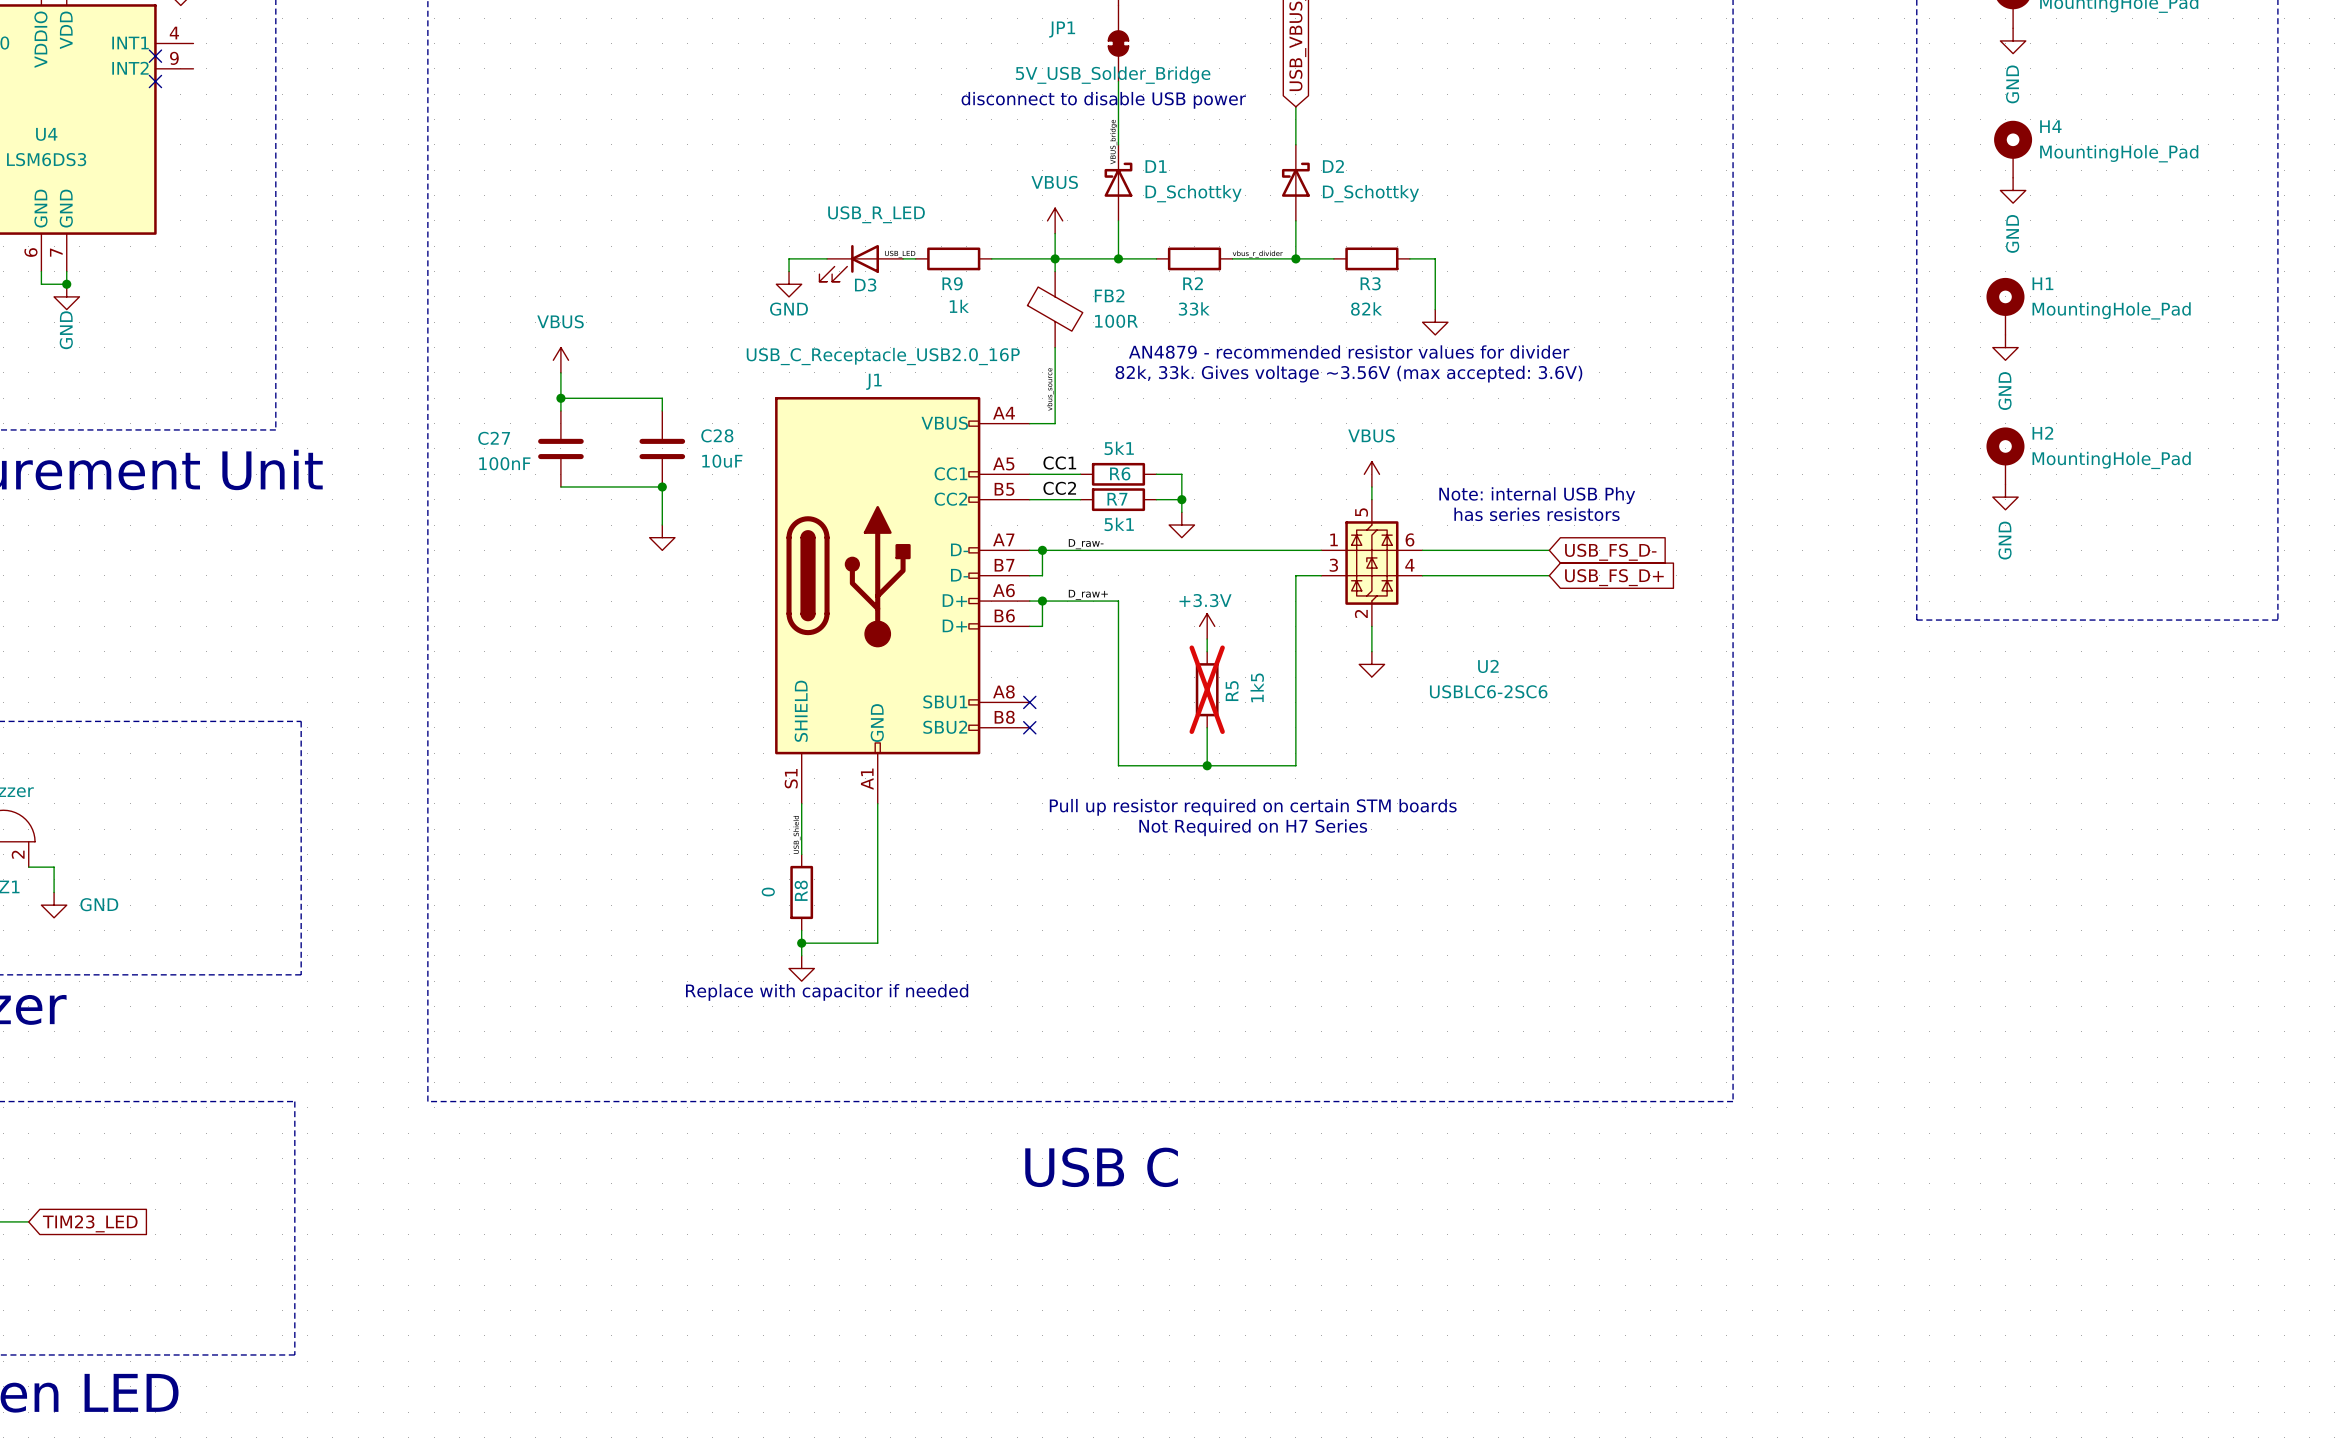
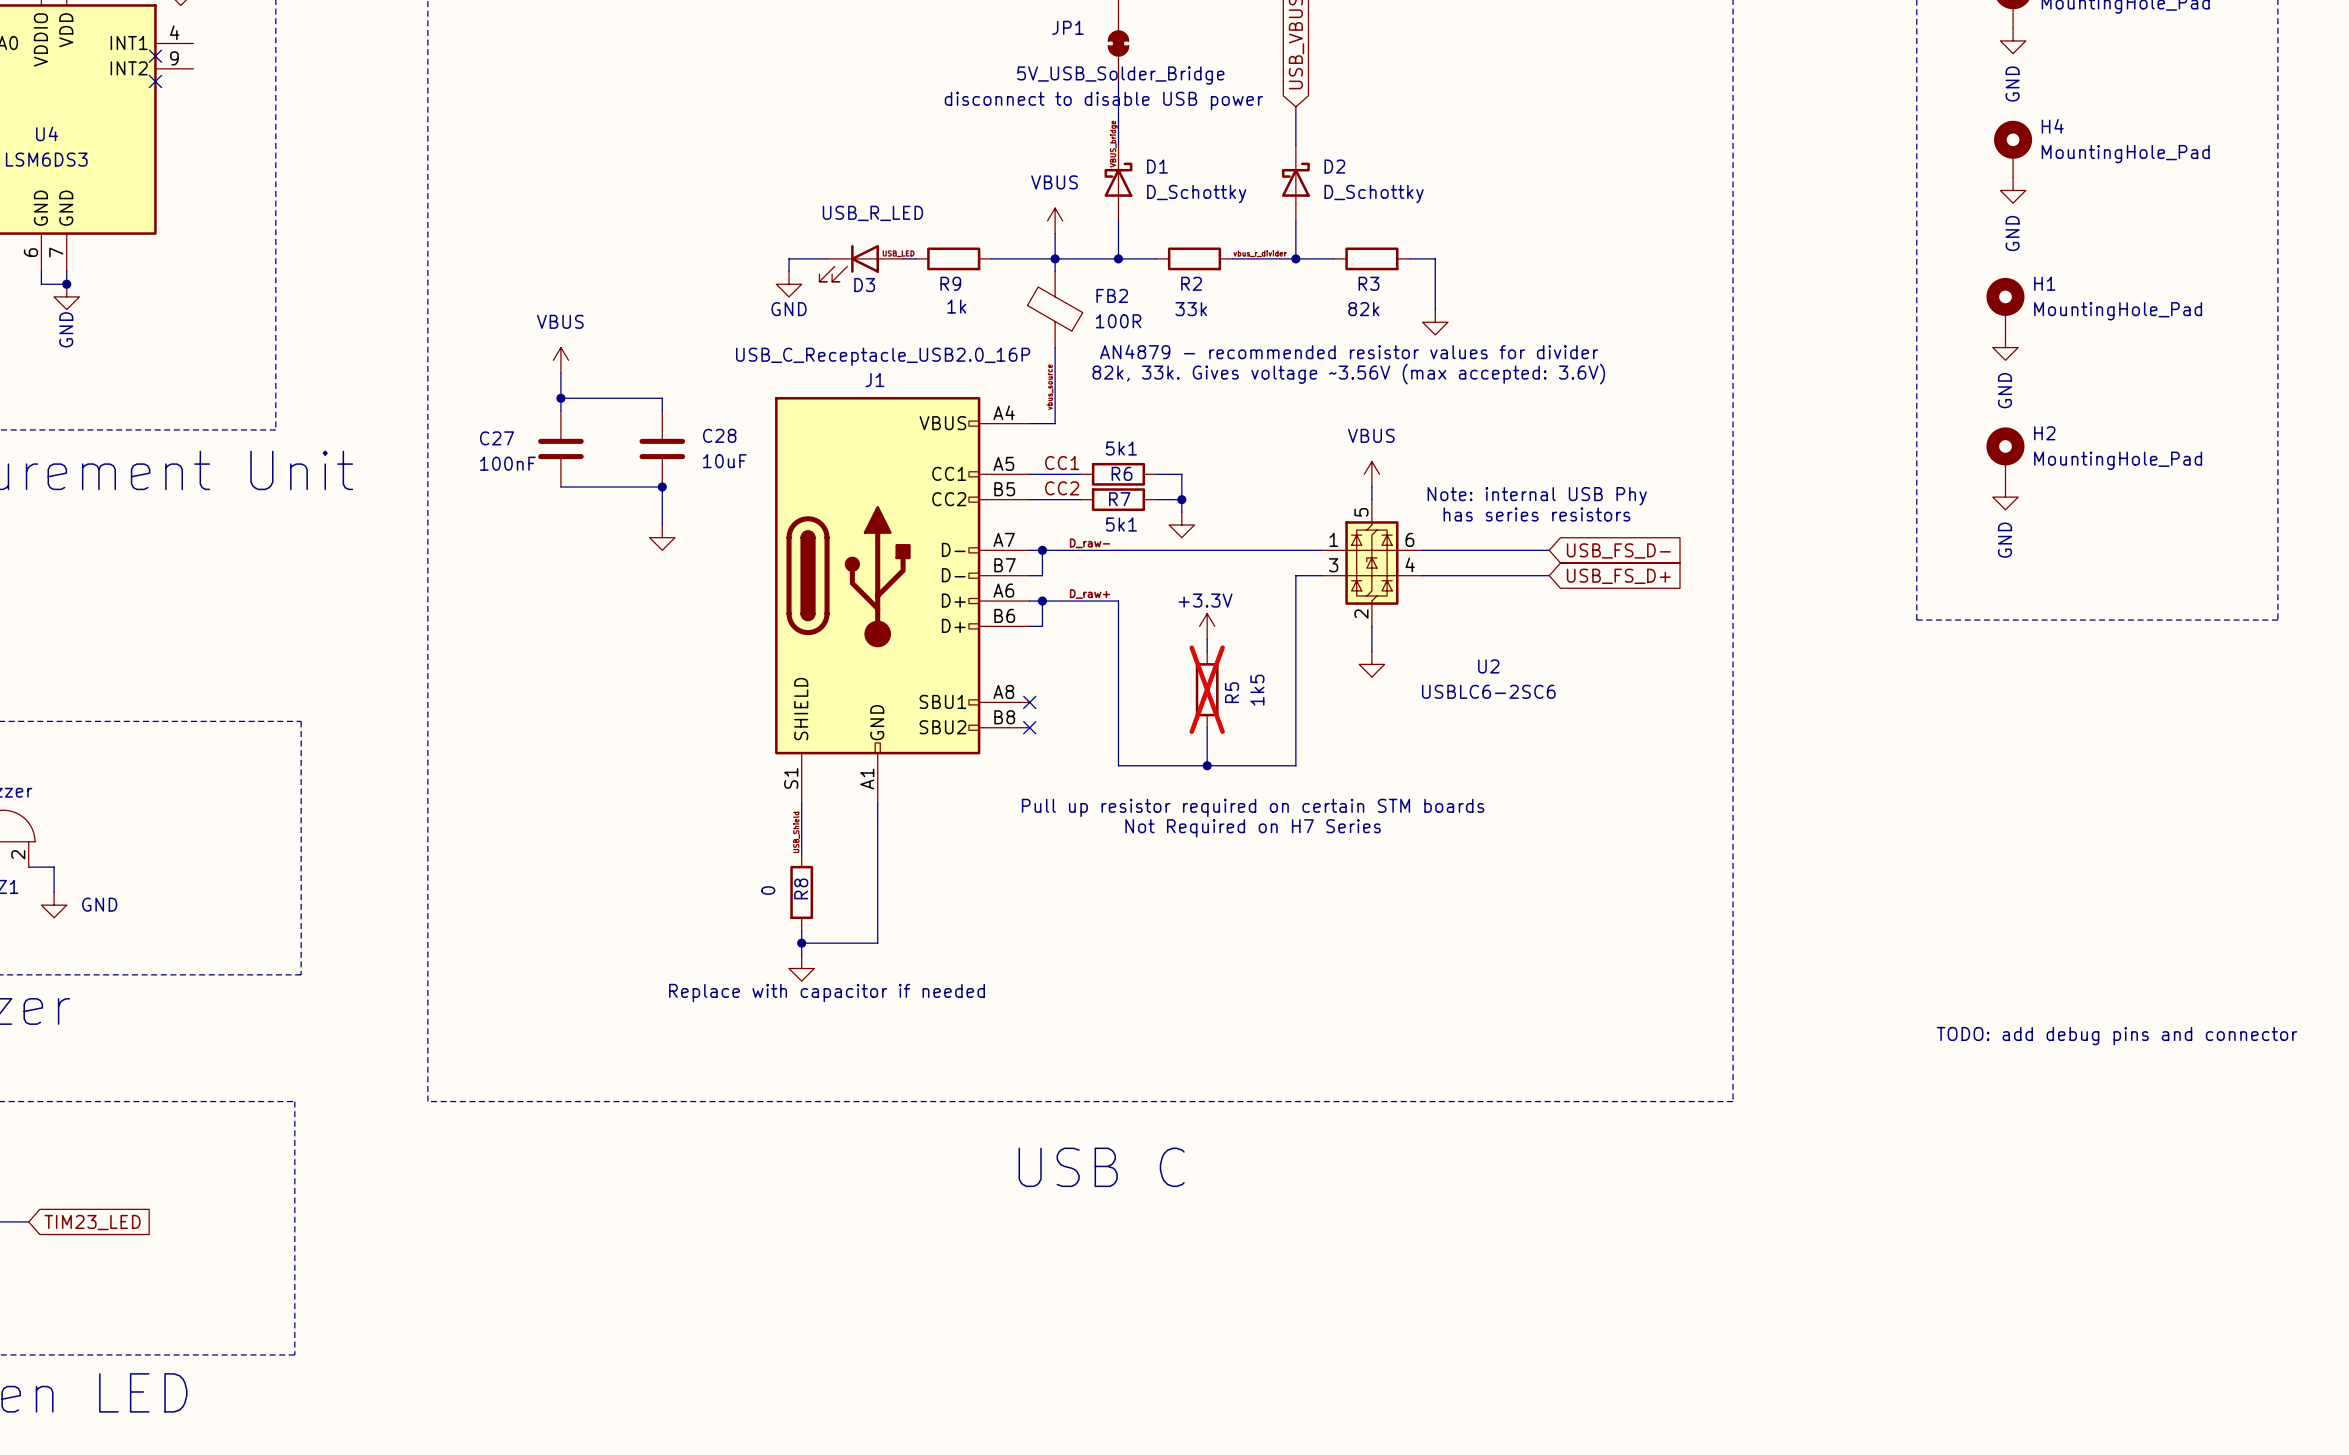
text: none -> TODO: add debug pins and connector (2116, 1036)

